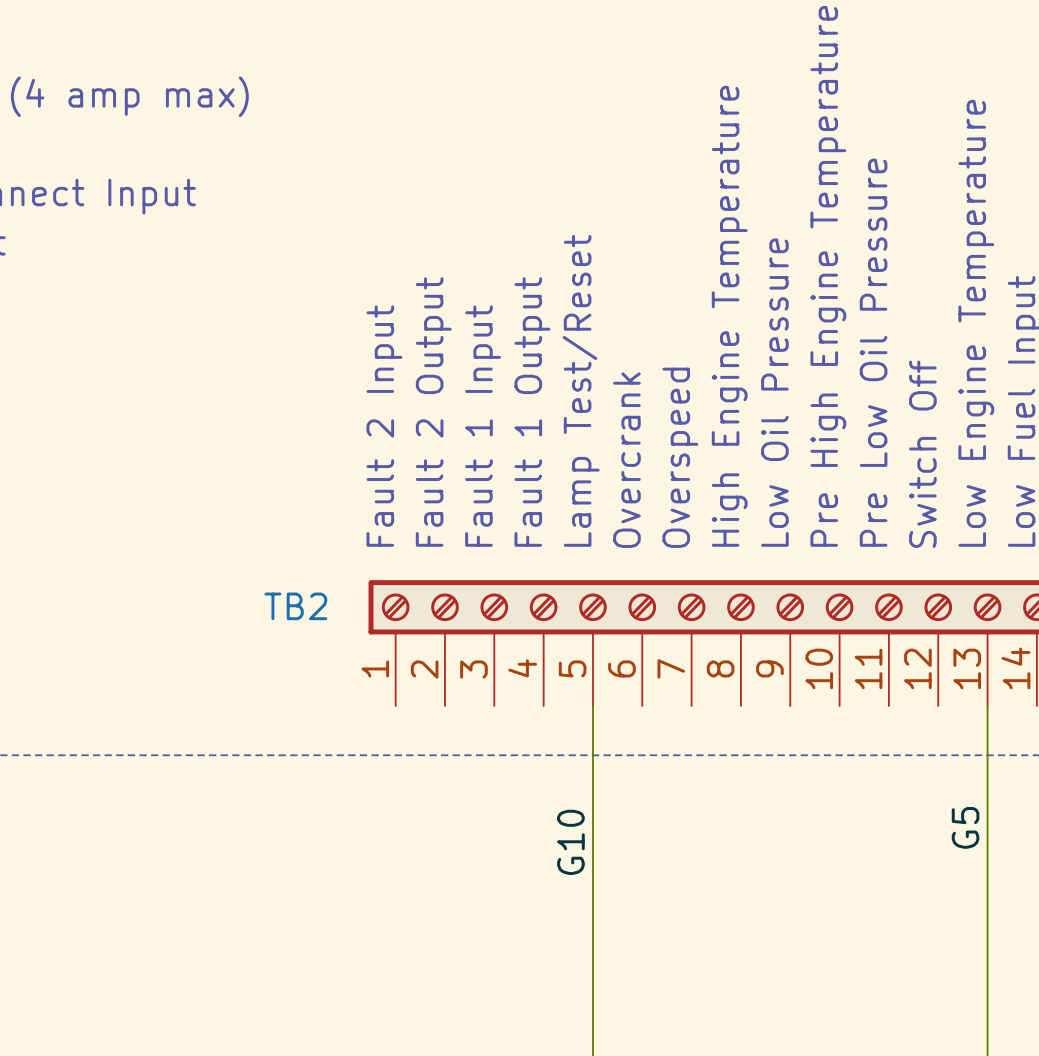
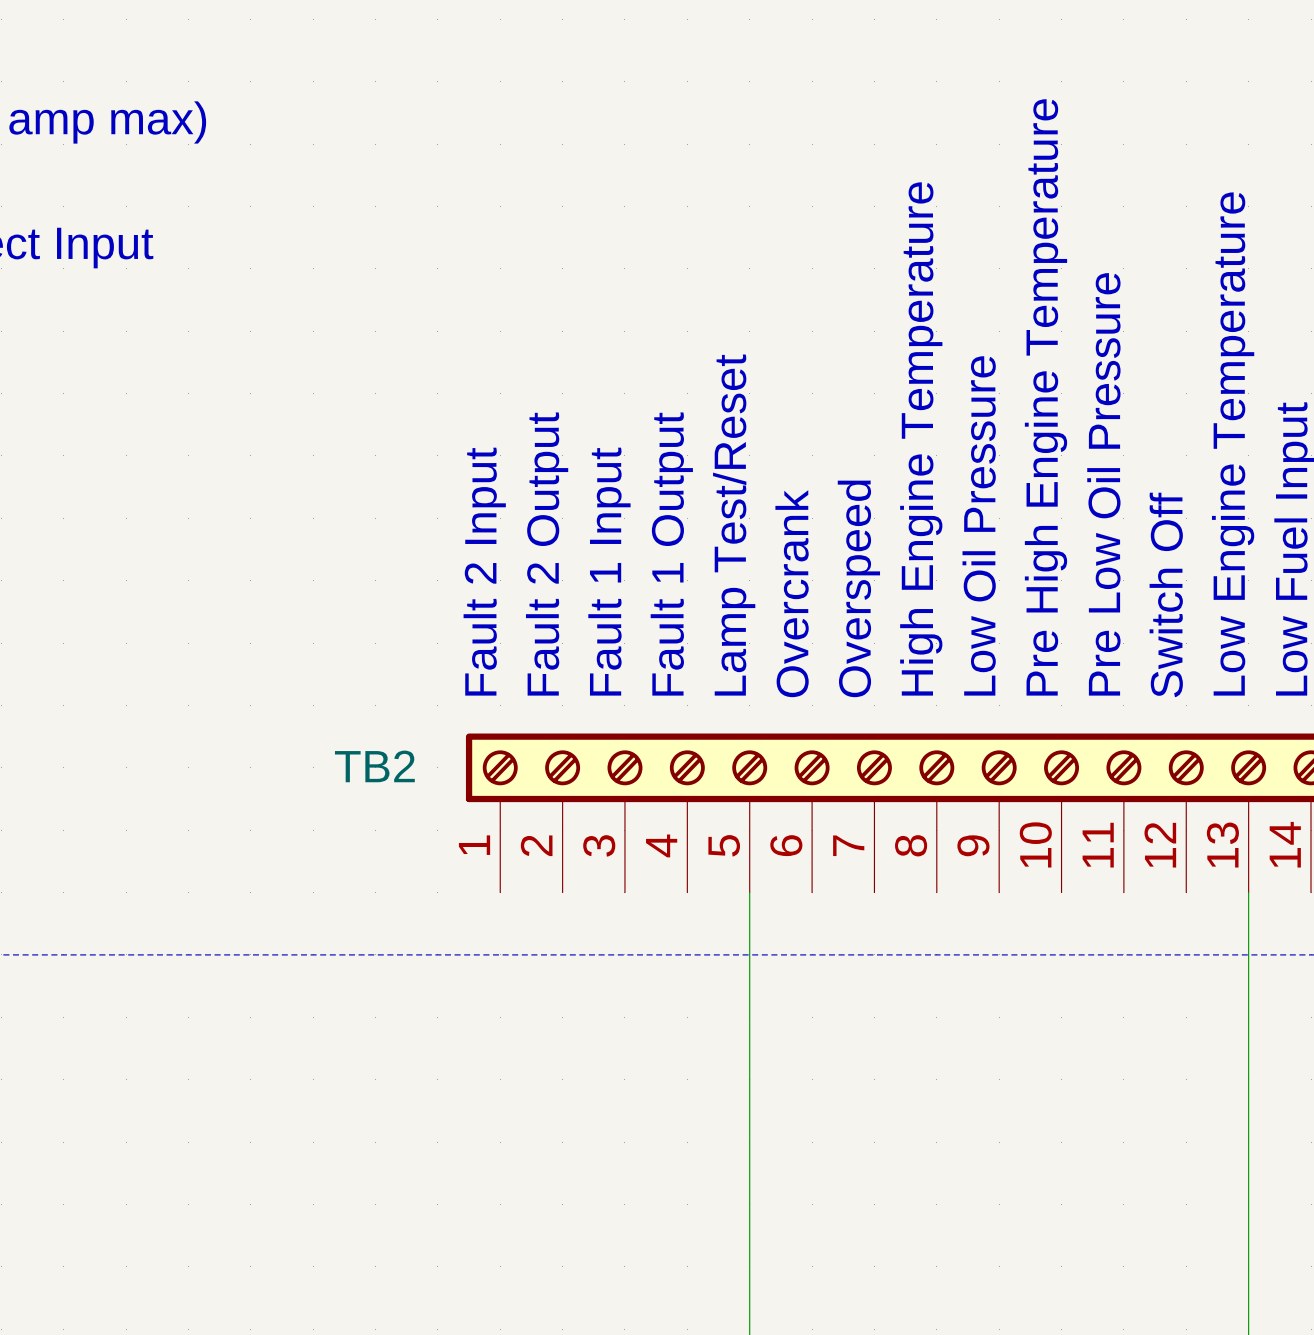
label: G5 (965, 827) -> none
label: G10 (570, 842) -> none

